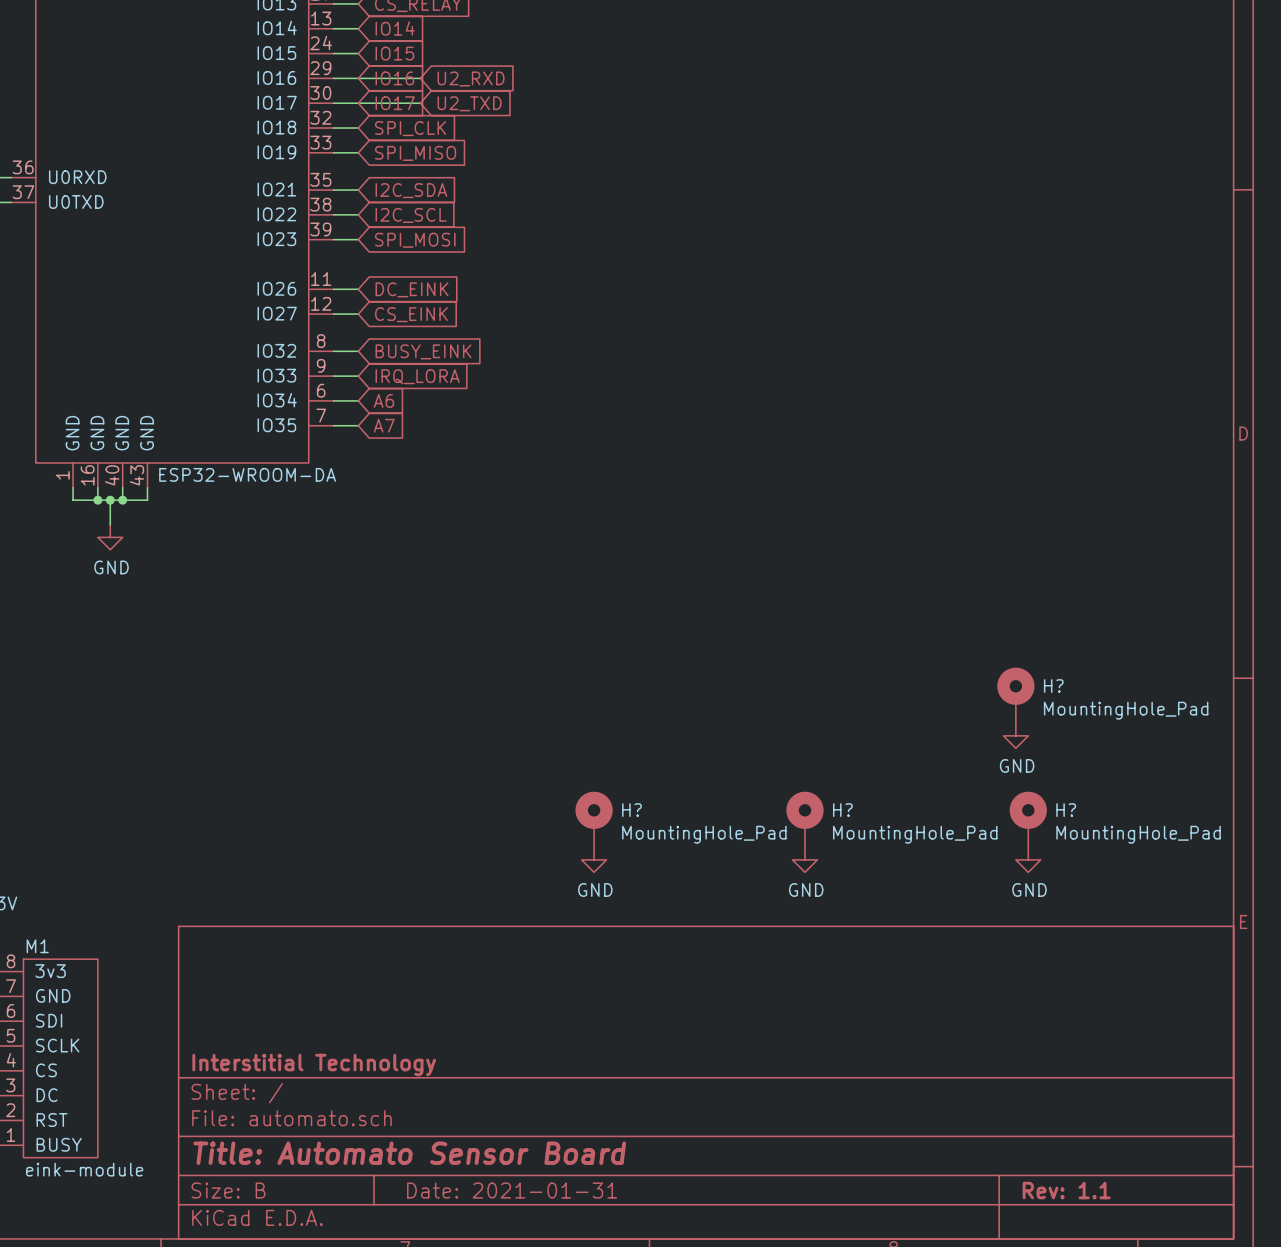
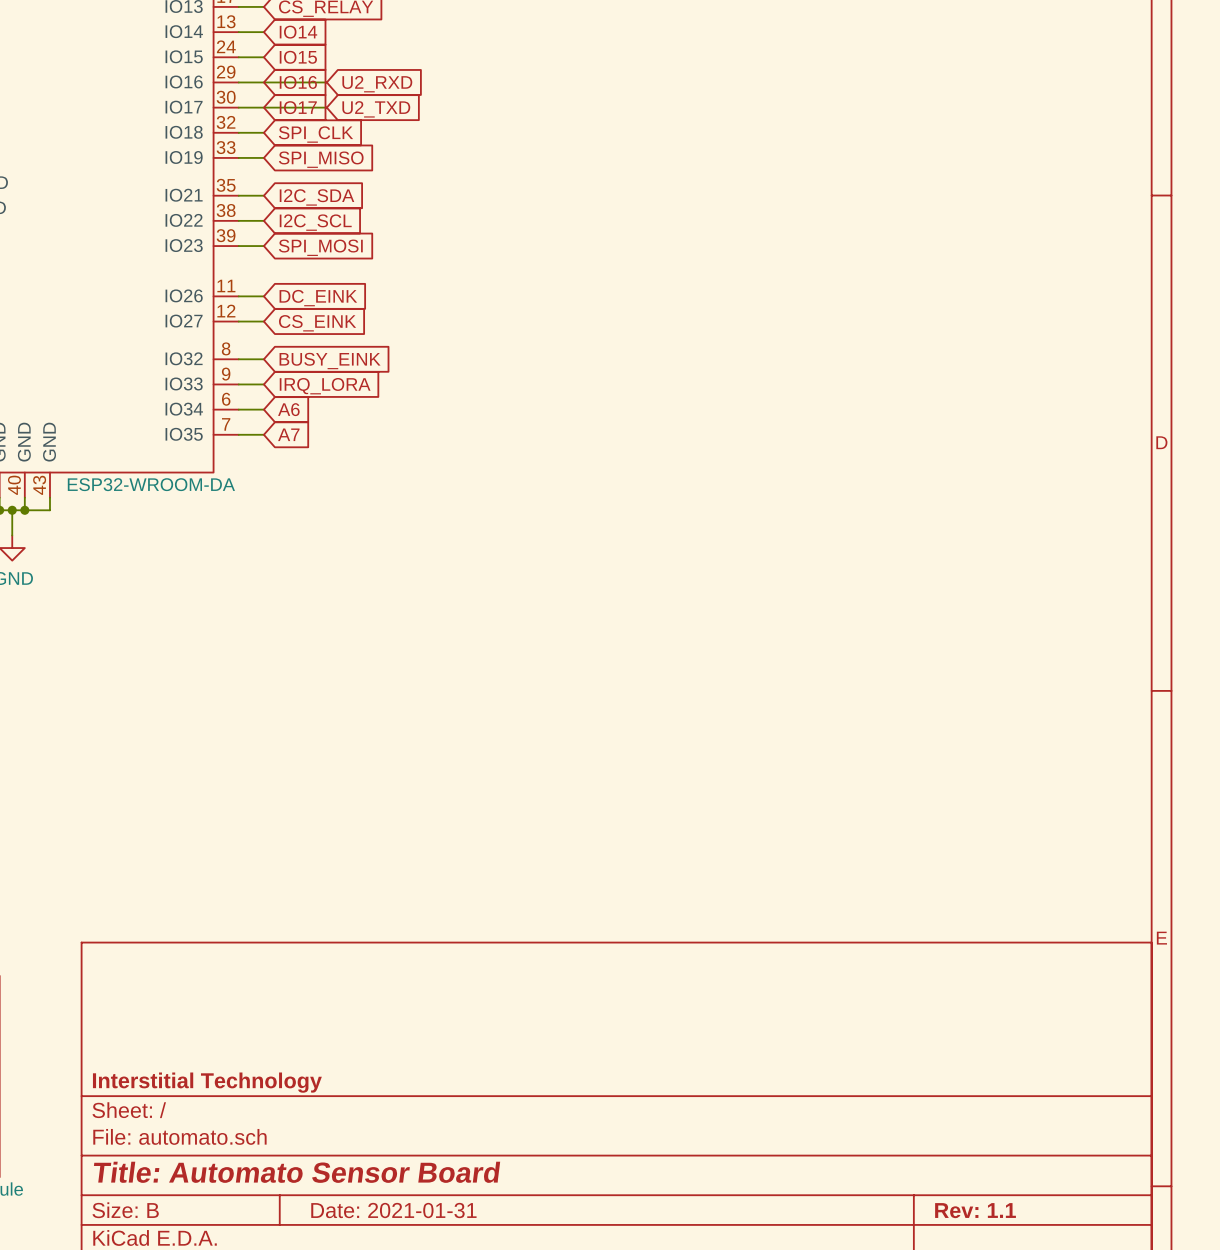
H?: MountingHole_Pad (1015, 695) -> none
power symbol: GND (1015, 735) -> none
H?: MountingHole_Pad (594, 819) -> none
H?: MountingHole_Pad (804, 819) -> none
H?: MountingHole_Pad (1028, 819) -> none
power symbol: GND (594, 859) -> none
power symbol: GND (804, 859) -> none
power symbol: GND (1028, 859) -> none

